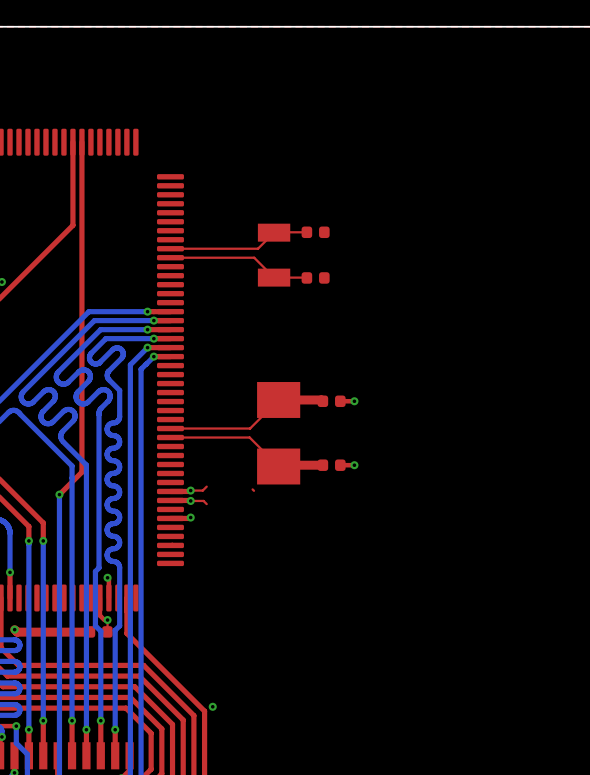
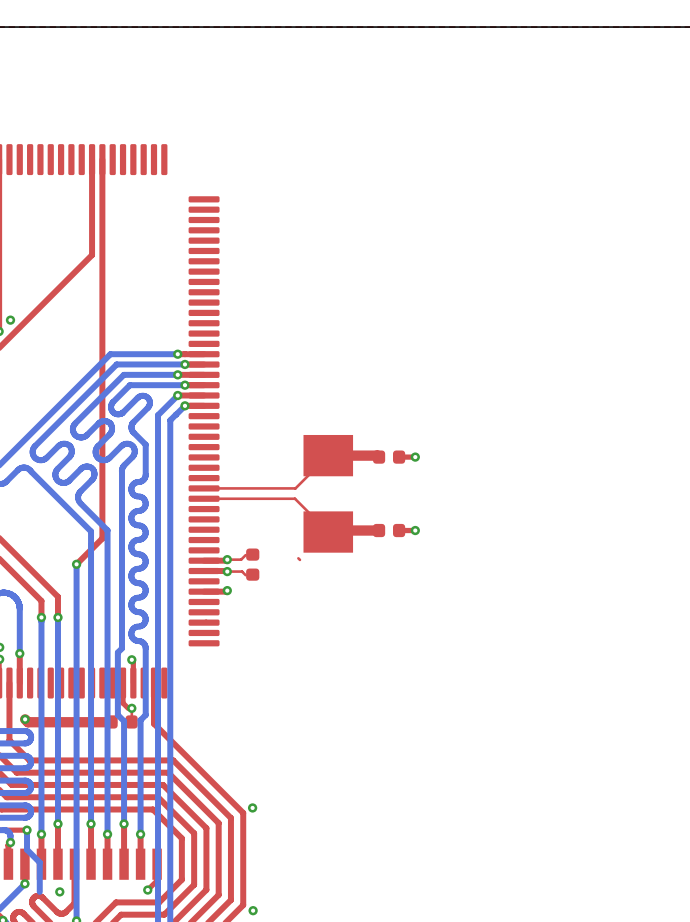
top track: (306, 232) (274, 232) (258, 248) (170, 248) -> none
part: (315, 232) -> none
part: (274, 255) -> none
top track: (170, 257) (254, 257) (274, 277) (306, 277) -> none
part: (315, 277) -> none
part: none -> (252, 564)

